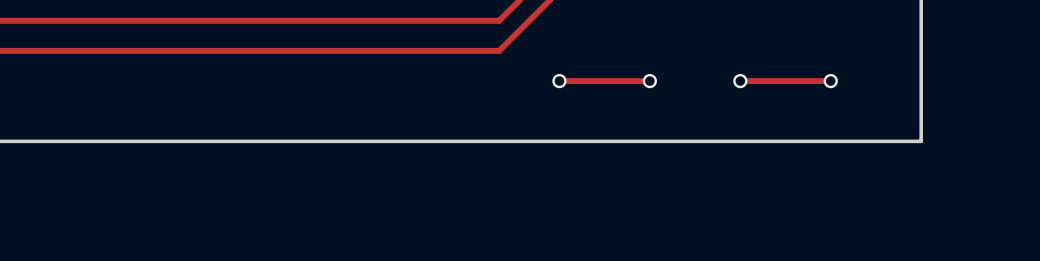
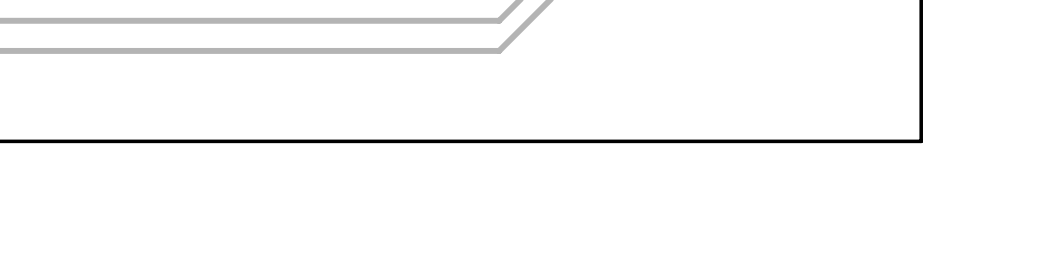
track: (559, 81) (649, 81) -> none
via: (559, 81) -> none
via: (649, 81) -> none
track: (740, 81) (830, 81) -> none
via: (740, 81) -> none
via: (830, 81) -> none

